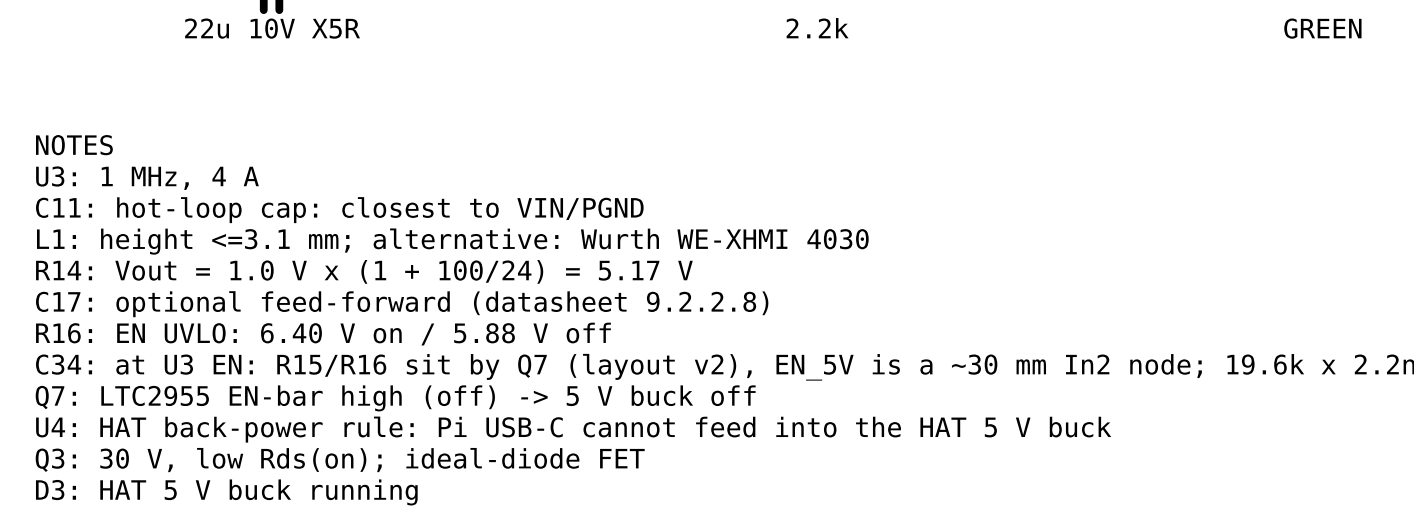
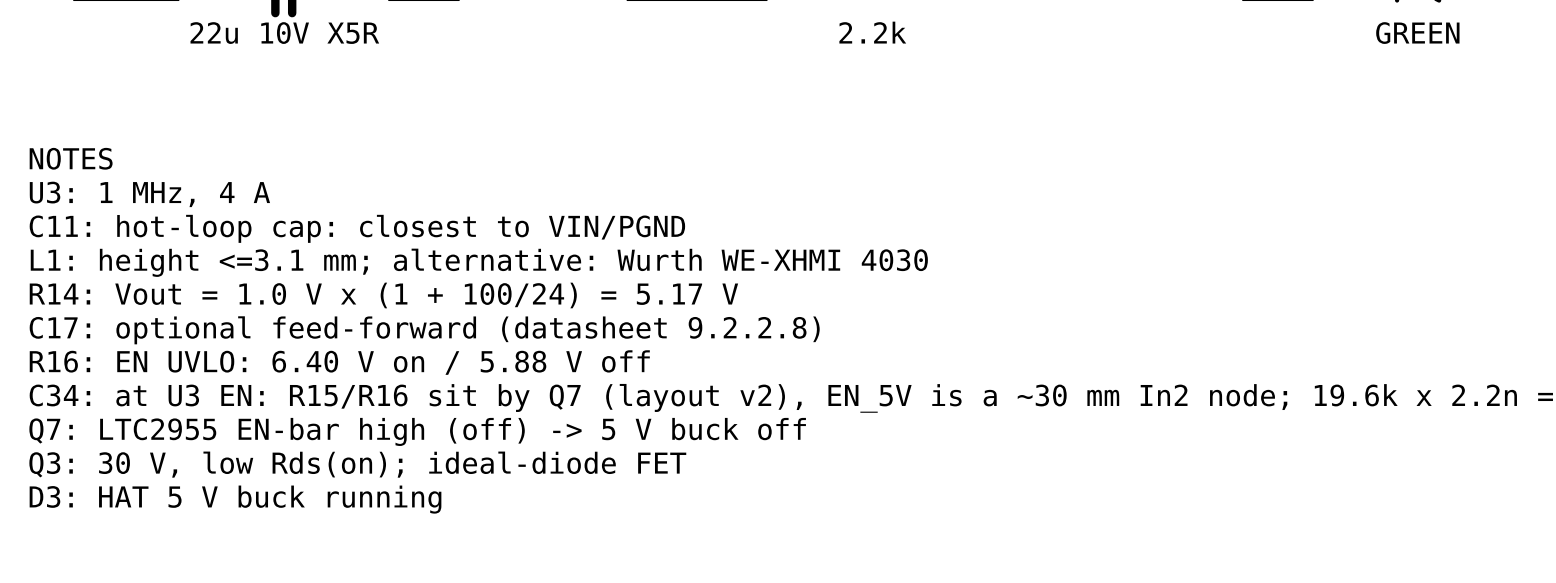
text: U4: HAT back-power rule: Pi USB-C cannot feed into the HAT 5 V buck (573, 429) -> Q3: 30 V, low Rds(on); ideal-diode FET (357, 464)
text: Q3: 30 V, low Rds(on); ideal-diode FET (340, 460) -> D3: HAT 5 V buck running (235, 499)
text: D3: HAT 5 V buck running (226, 492) -> none

